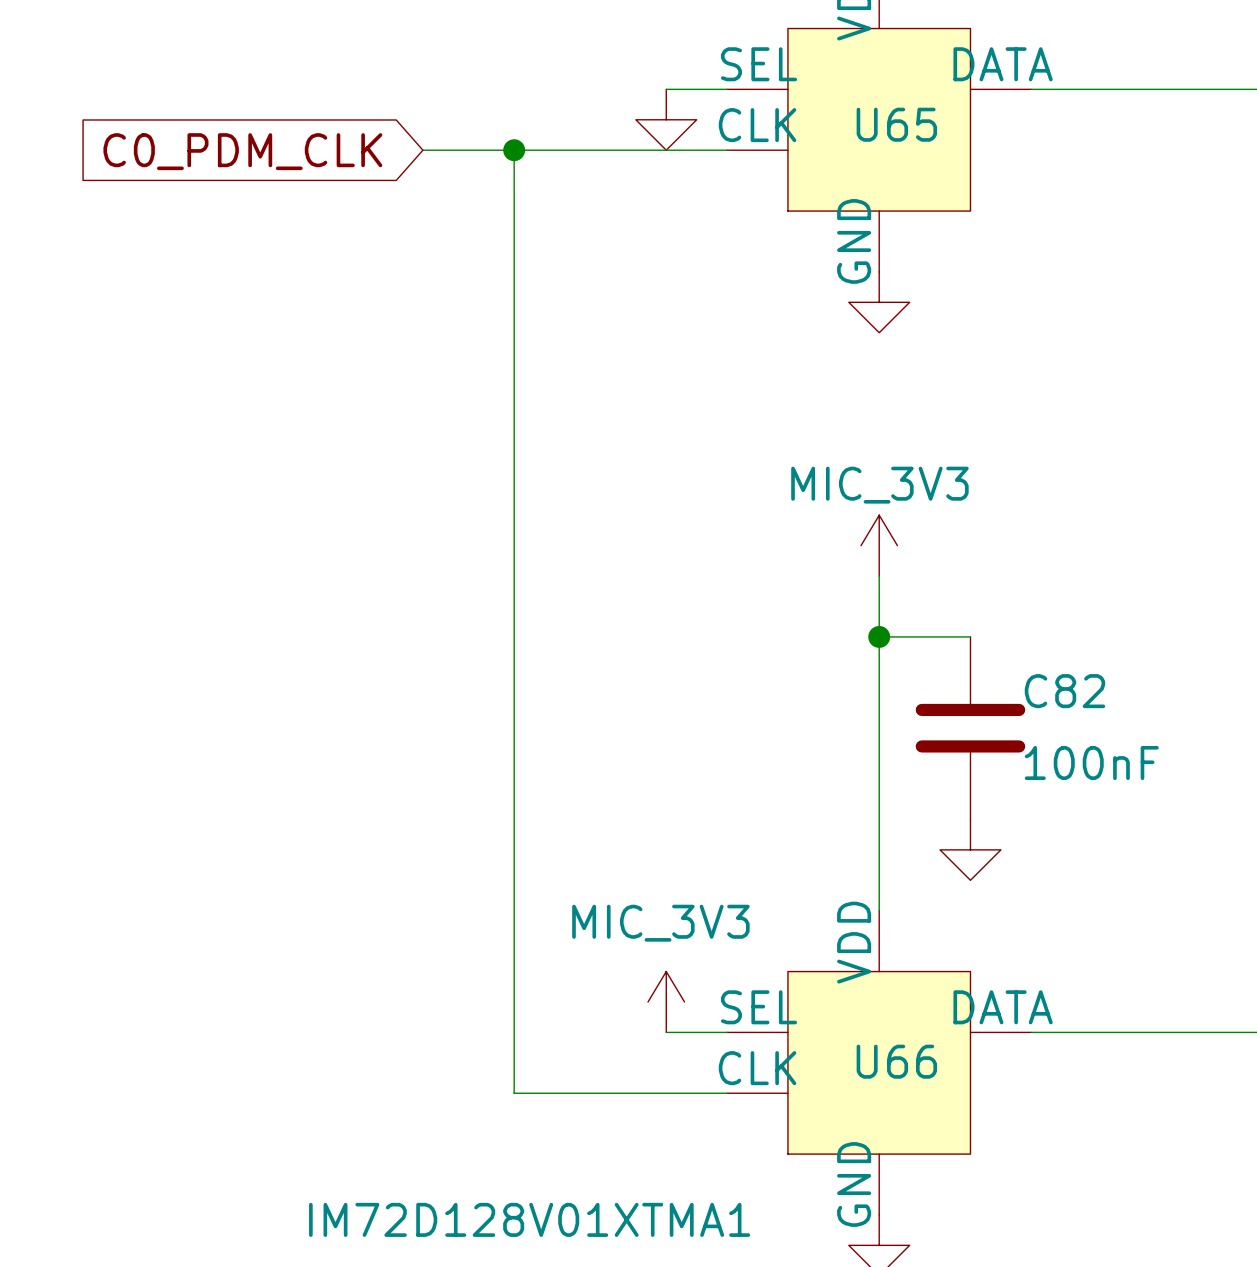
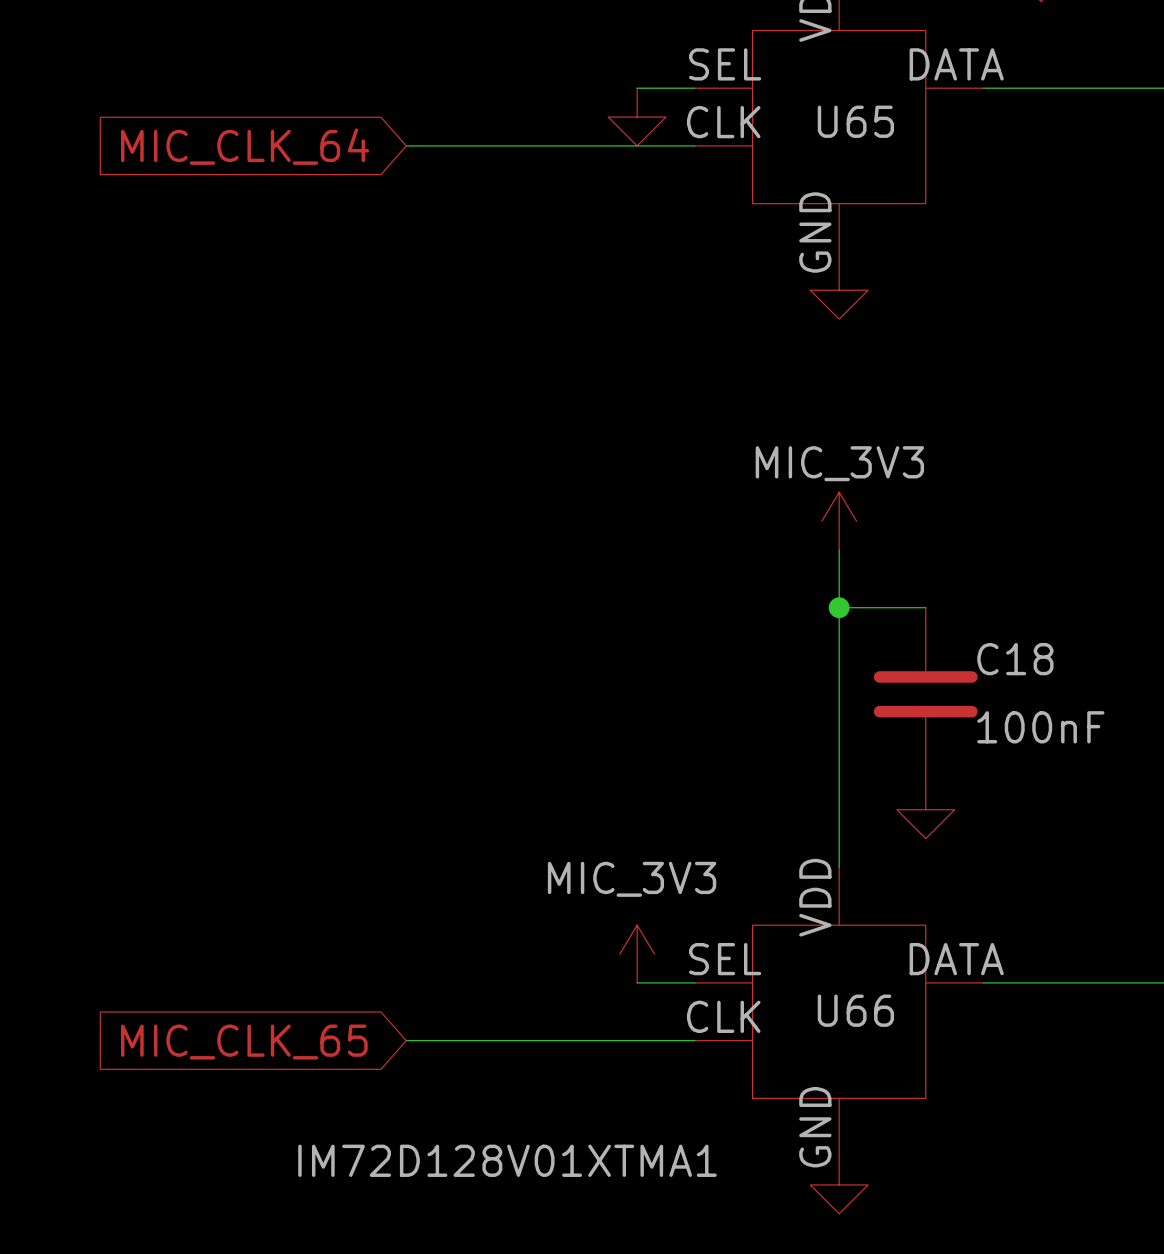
wire: (514, 150) (514, 1093) -> (406, 1040) (492, 1040)
junction: (514, 150) -> none
global label: C0_PDM_CLK (242, 151) -> MIC_CLK_64 (245, 146)
C82 name: C82 (1064, 691) -> C18 (1015, 659)
global label: none -> MIC_CLK_65 (244, 1042)

